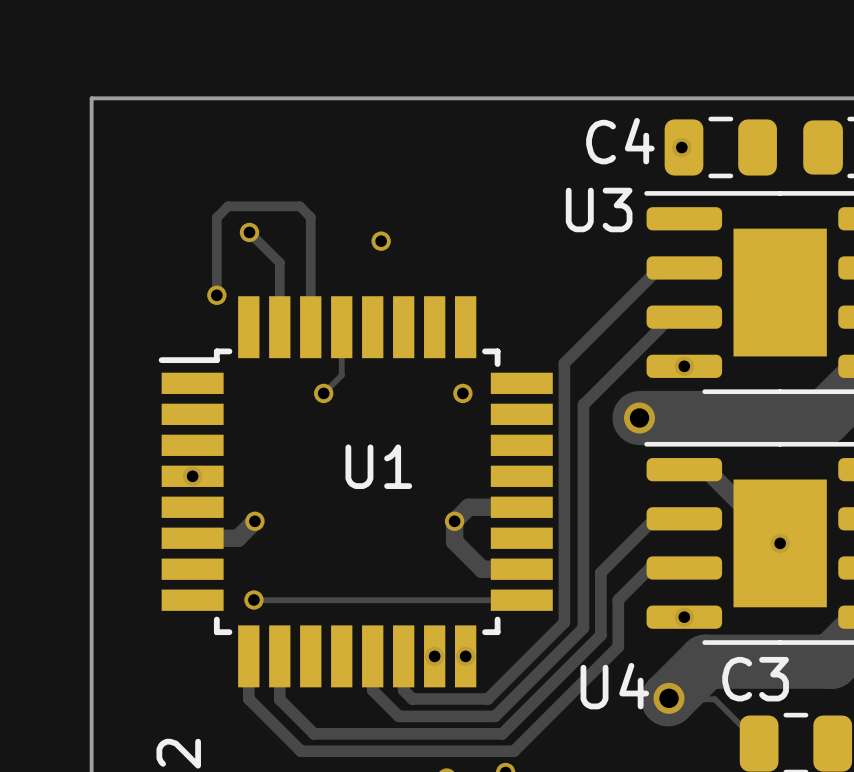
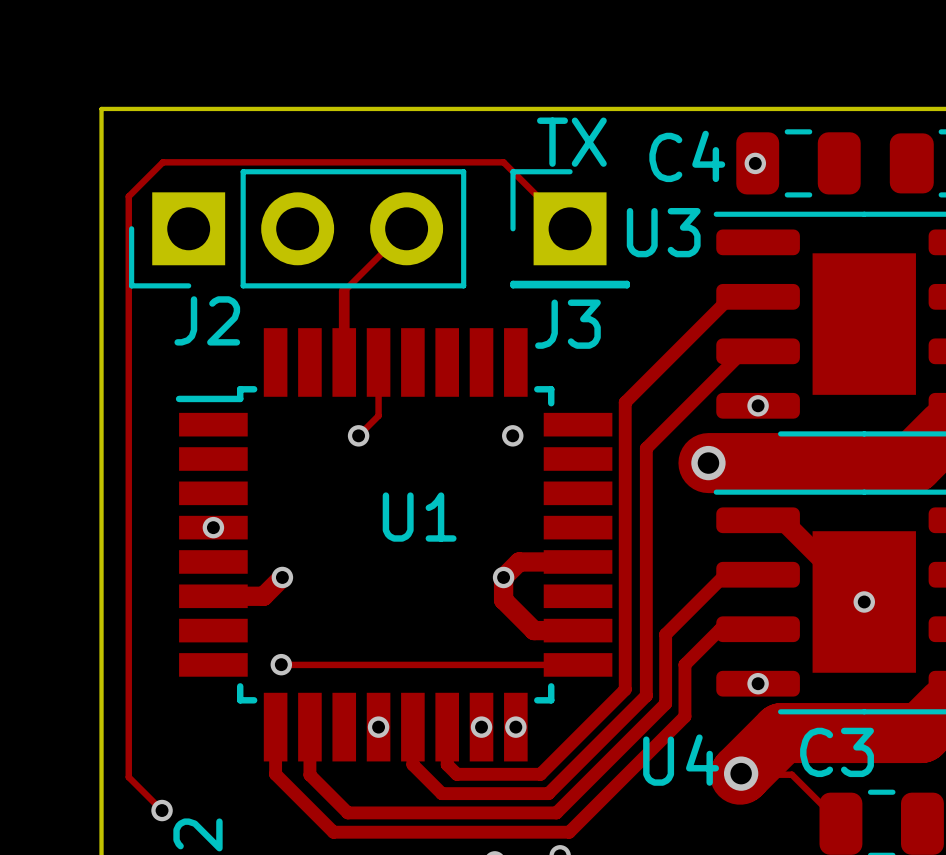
text: none -> TX (571, 142)
J2: none -> (297, 228)
track: none -> (570, 228) (503, 162) (162, 162) (128, 196) (128, 777) (162, 810)
J3: none -> (570, 228)
track: (249, 232) (279, 262) (279, 327) -> none
via: (249, 232) -> none
via: (381, 241) -> none
track: (310, 262) (310, 217) (299, 206) (228, 206) (216, 217) (216, 295) -> (344, 291) (406, 228)
via: (216, 295) -> none
via: none -> (378, 727)
via: none -> (162, 810)

